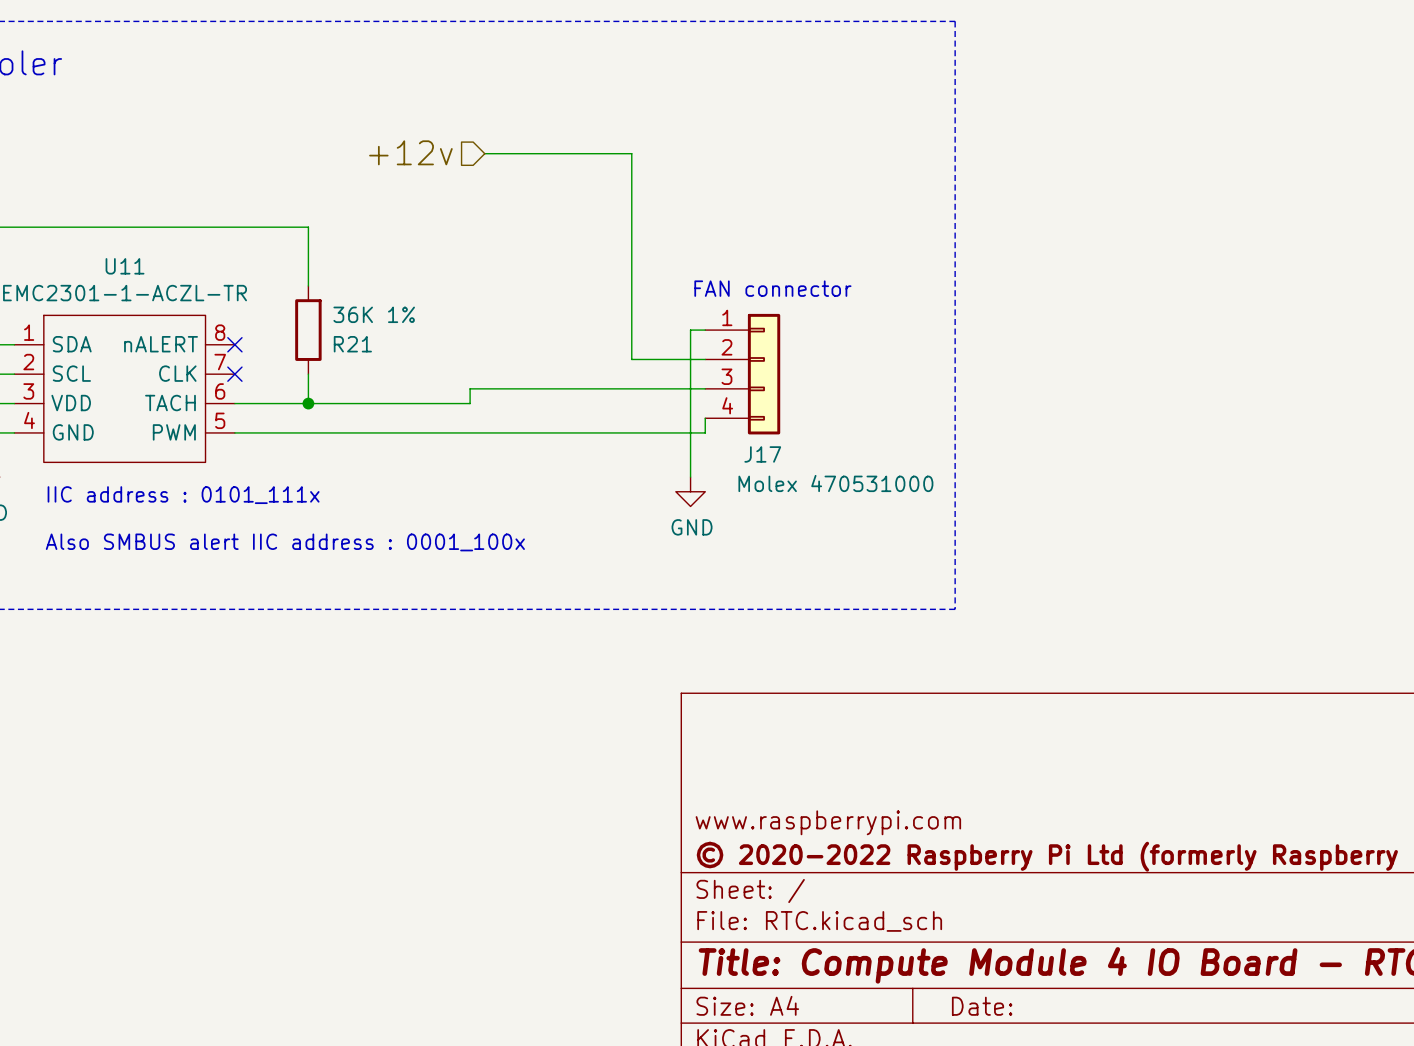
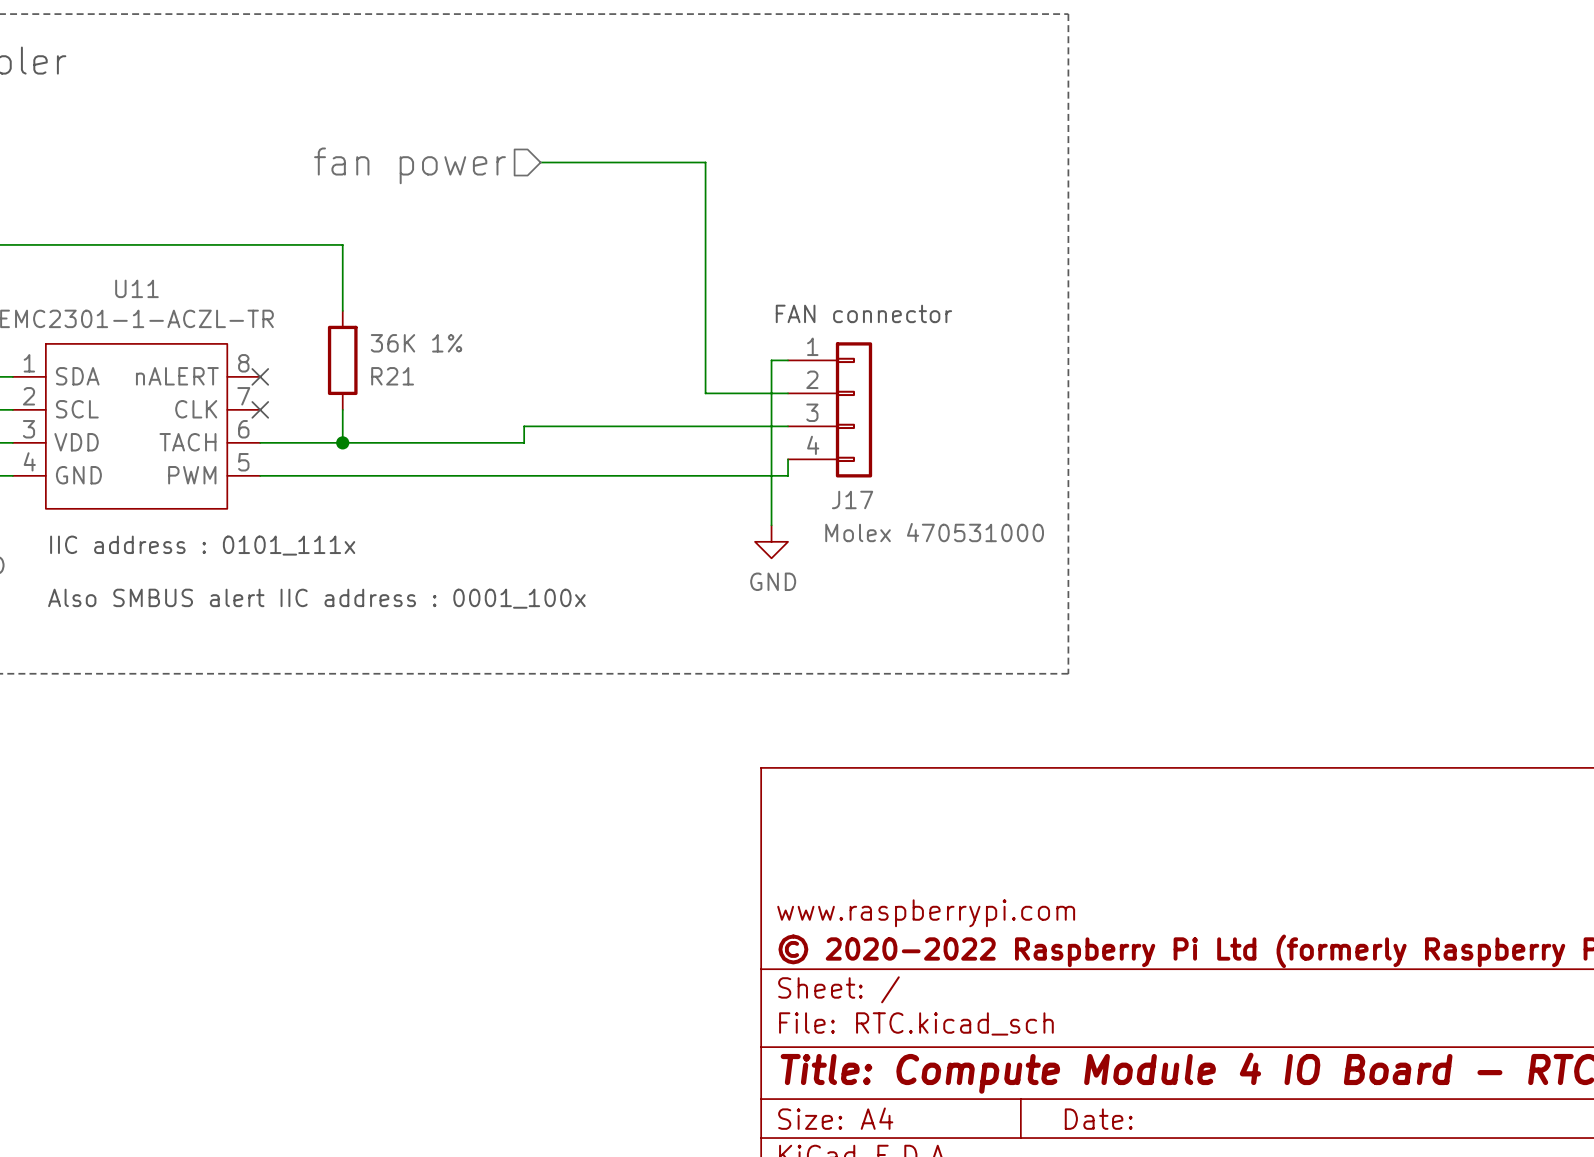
hierarchical label: +12v (410, 152) -> fan power (409, 165)

